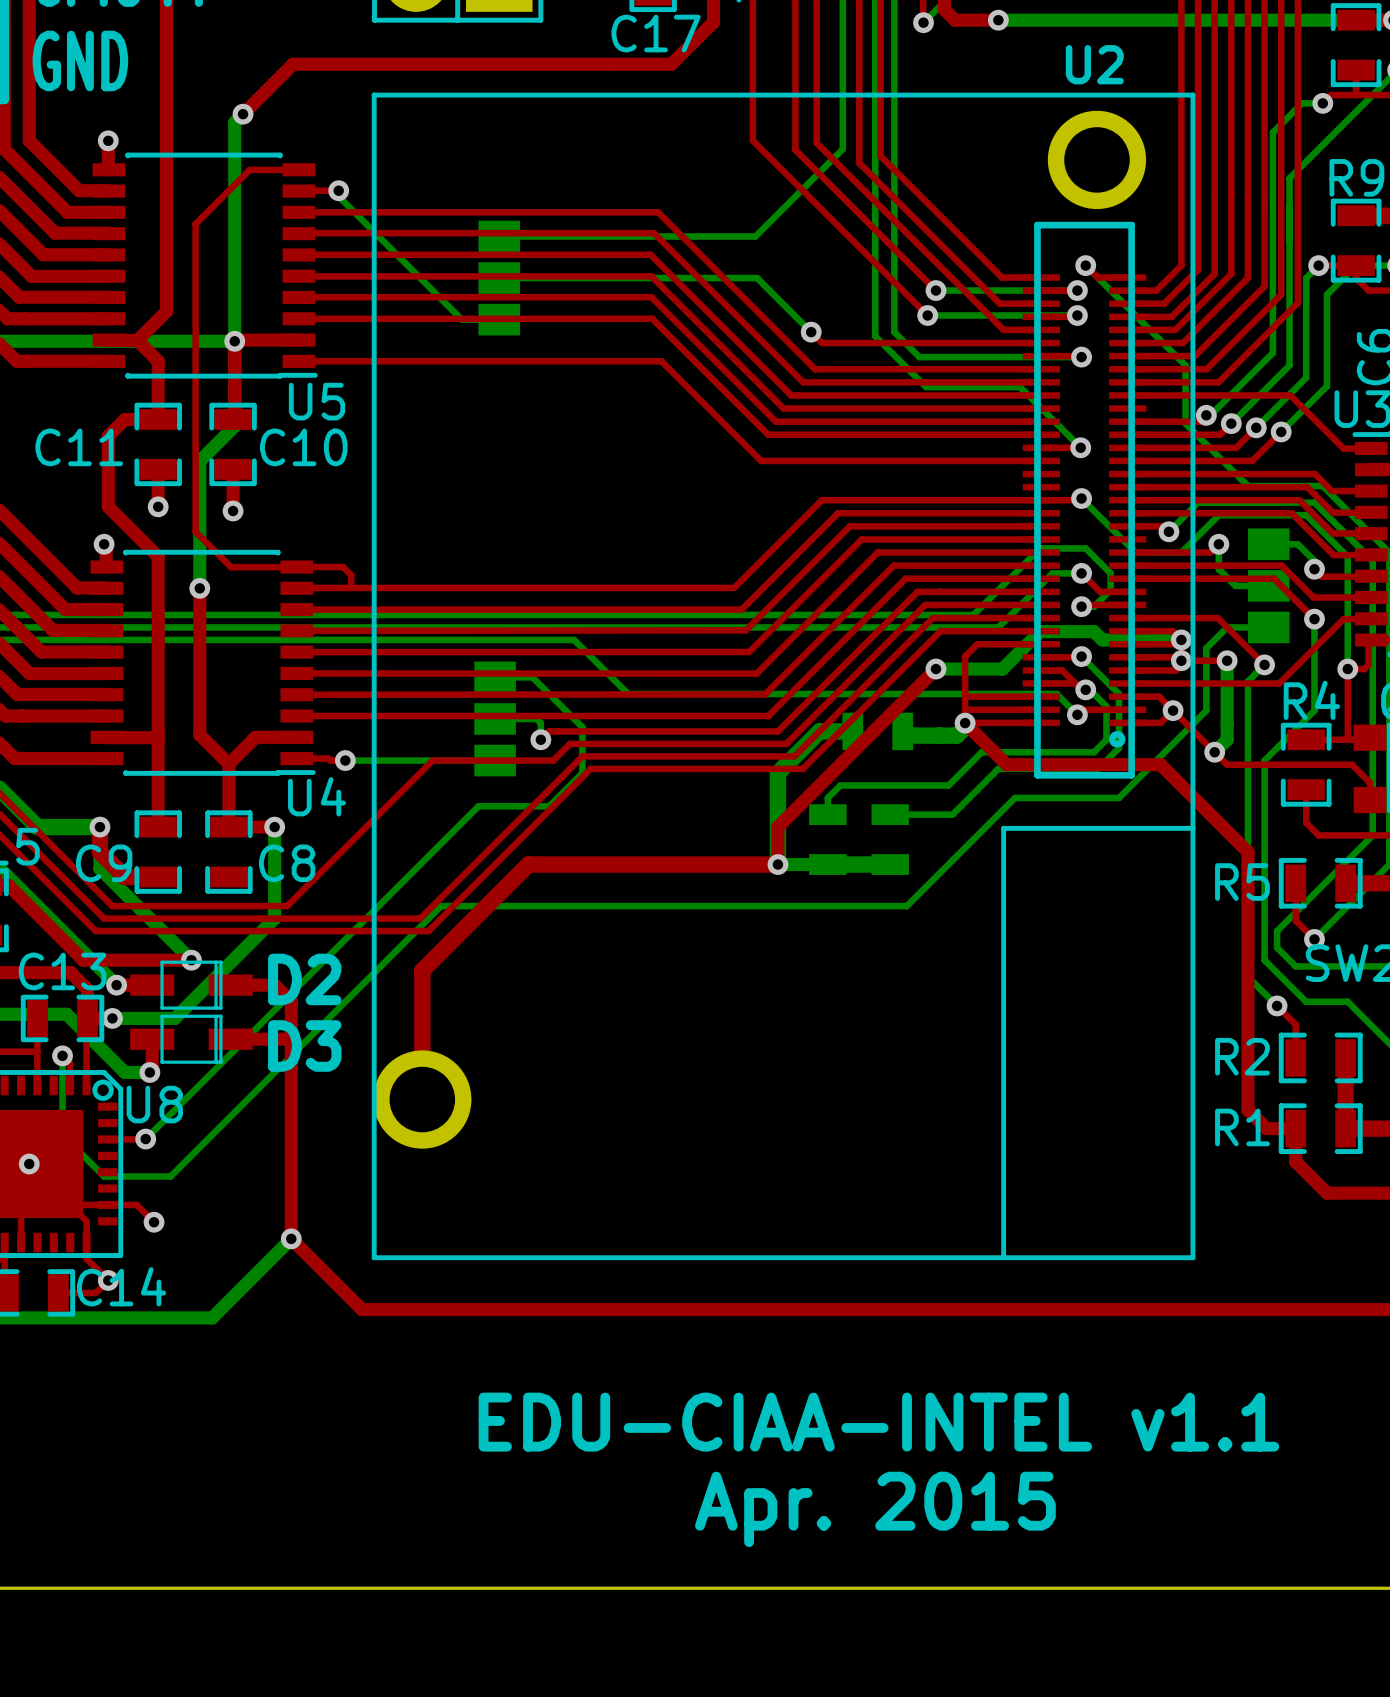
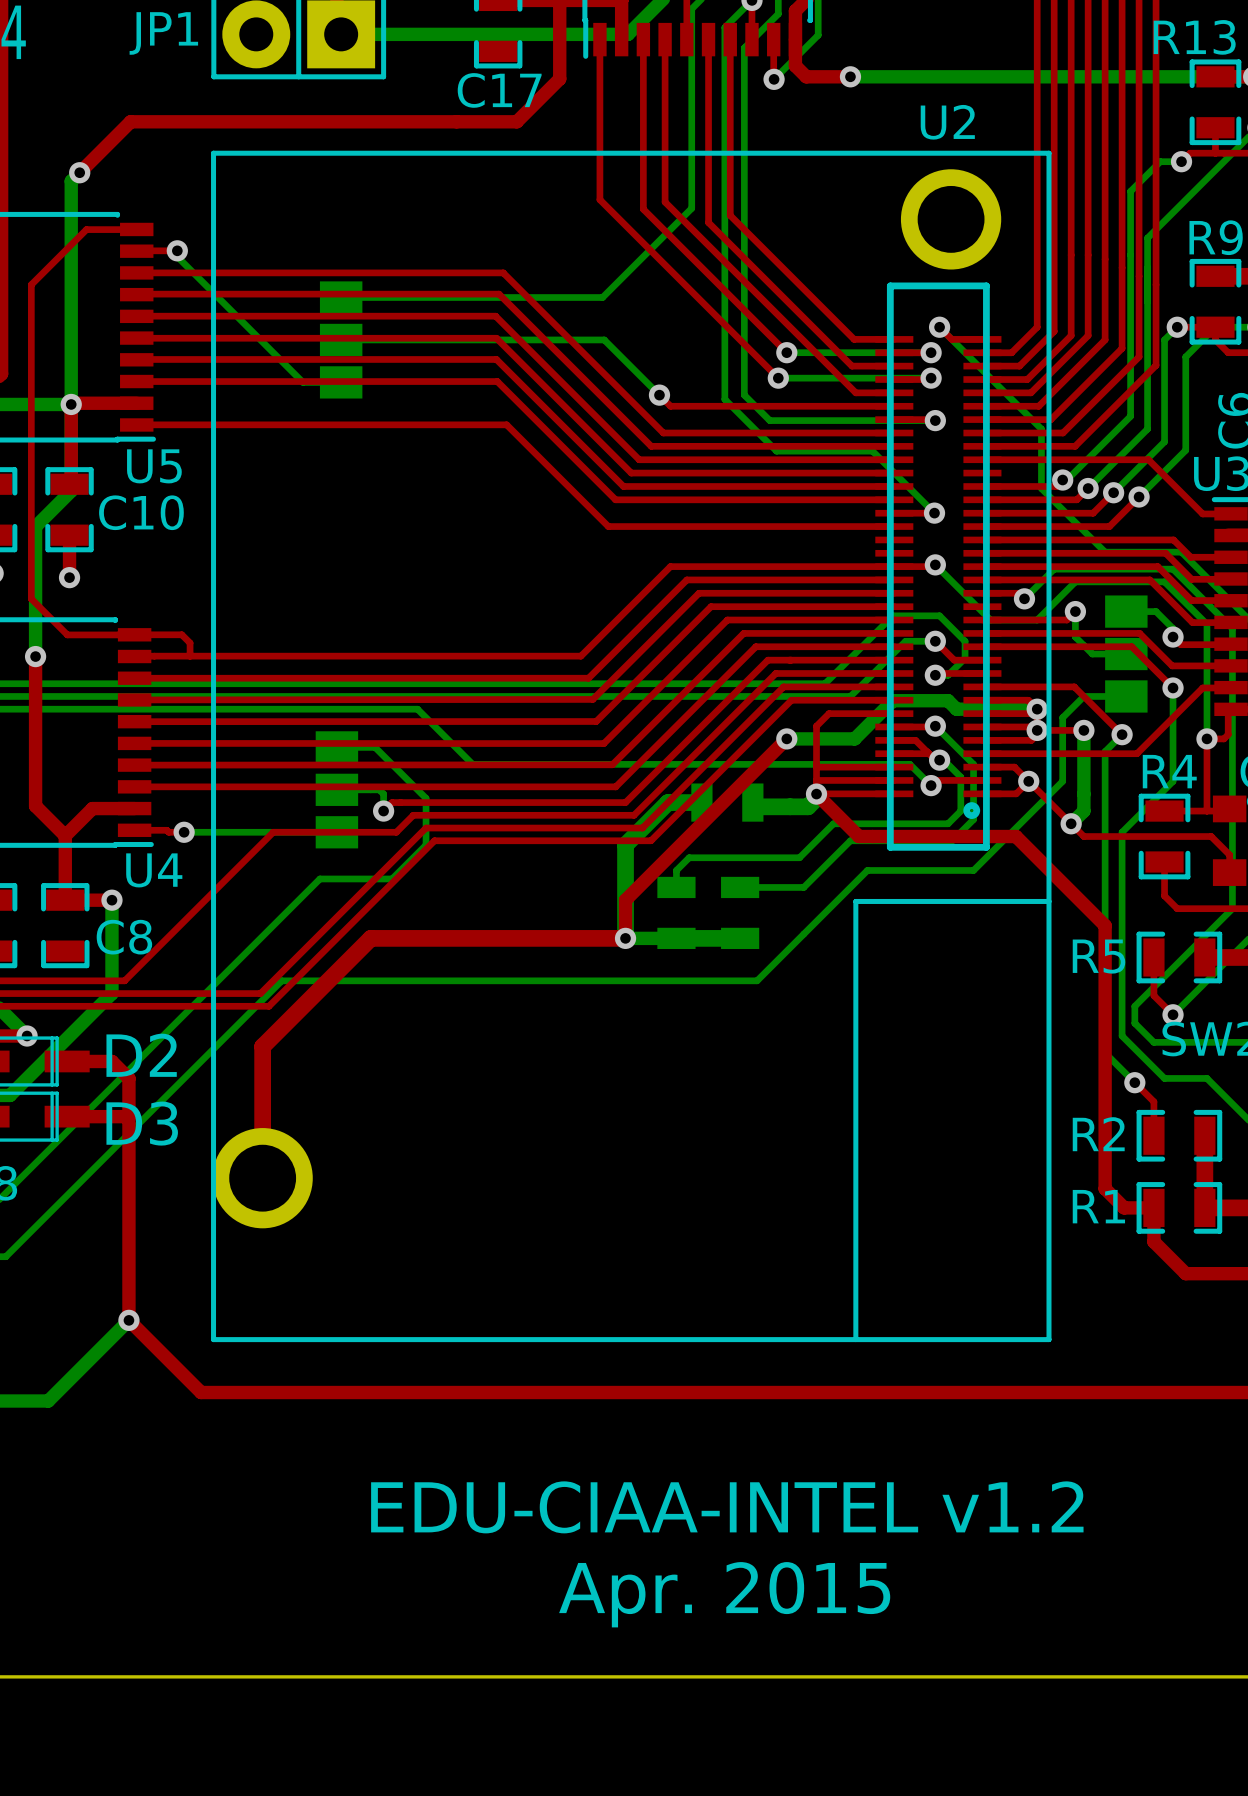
text: EDU-CIAA-INTEL v1.1 (878, 1422) -> EDU-CIAA-INTEL v1.2 (727, 1507)

